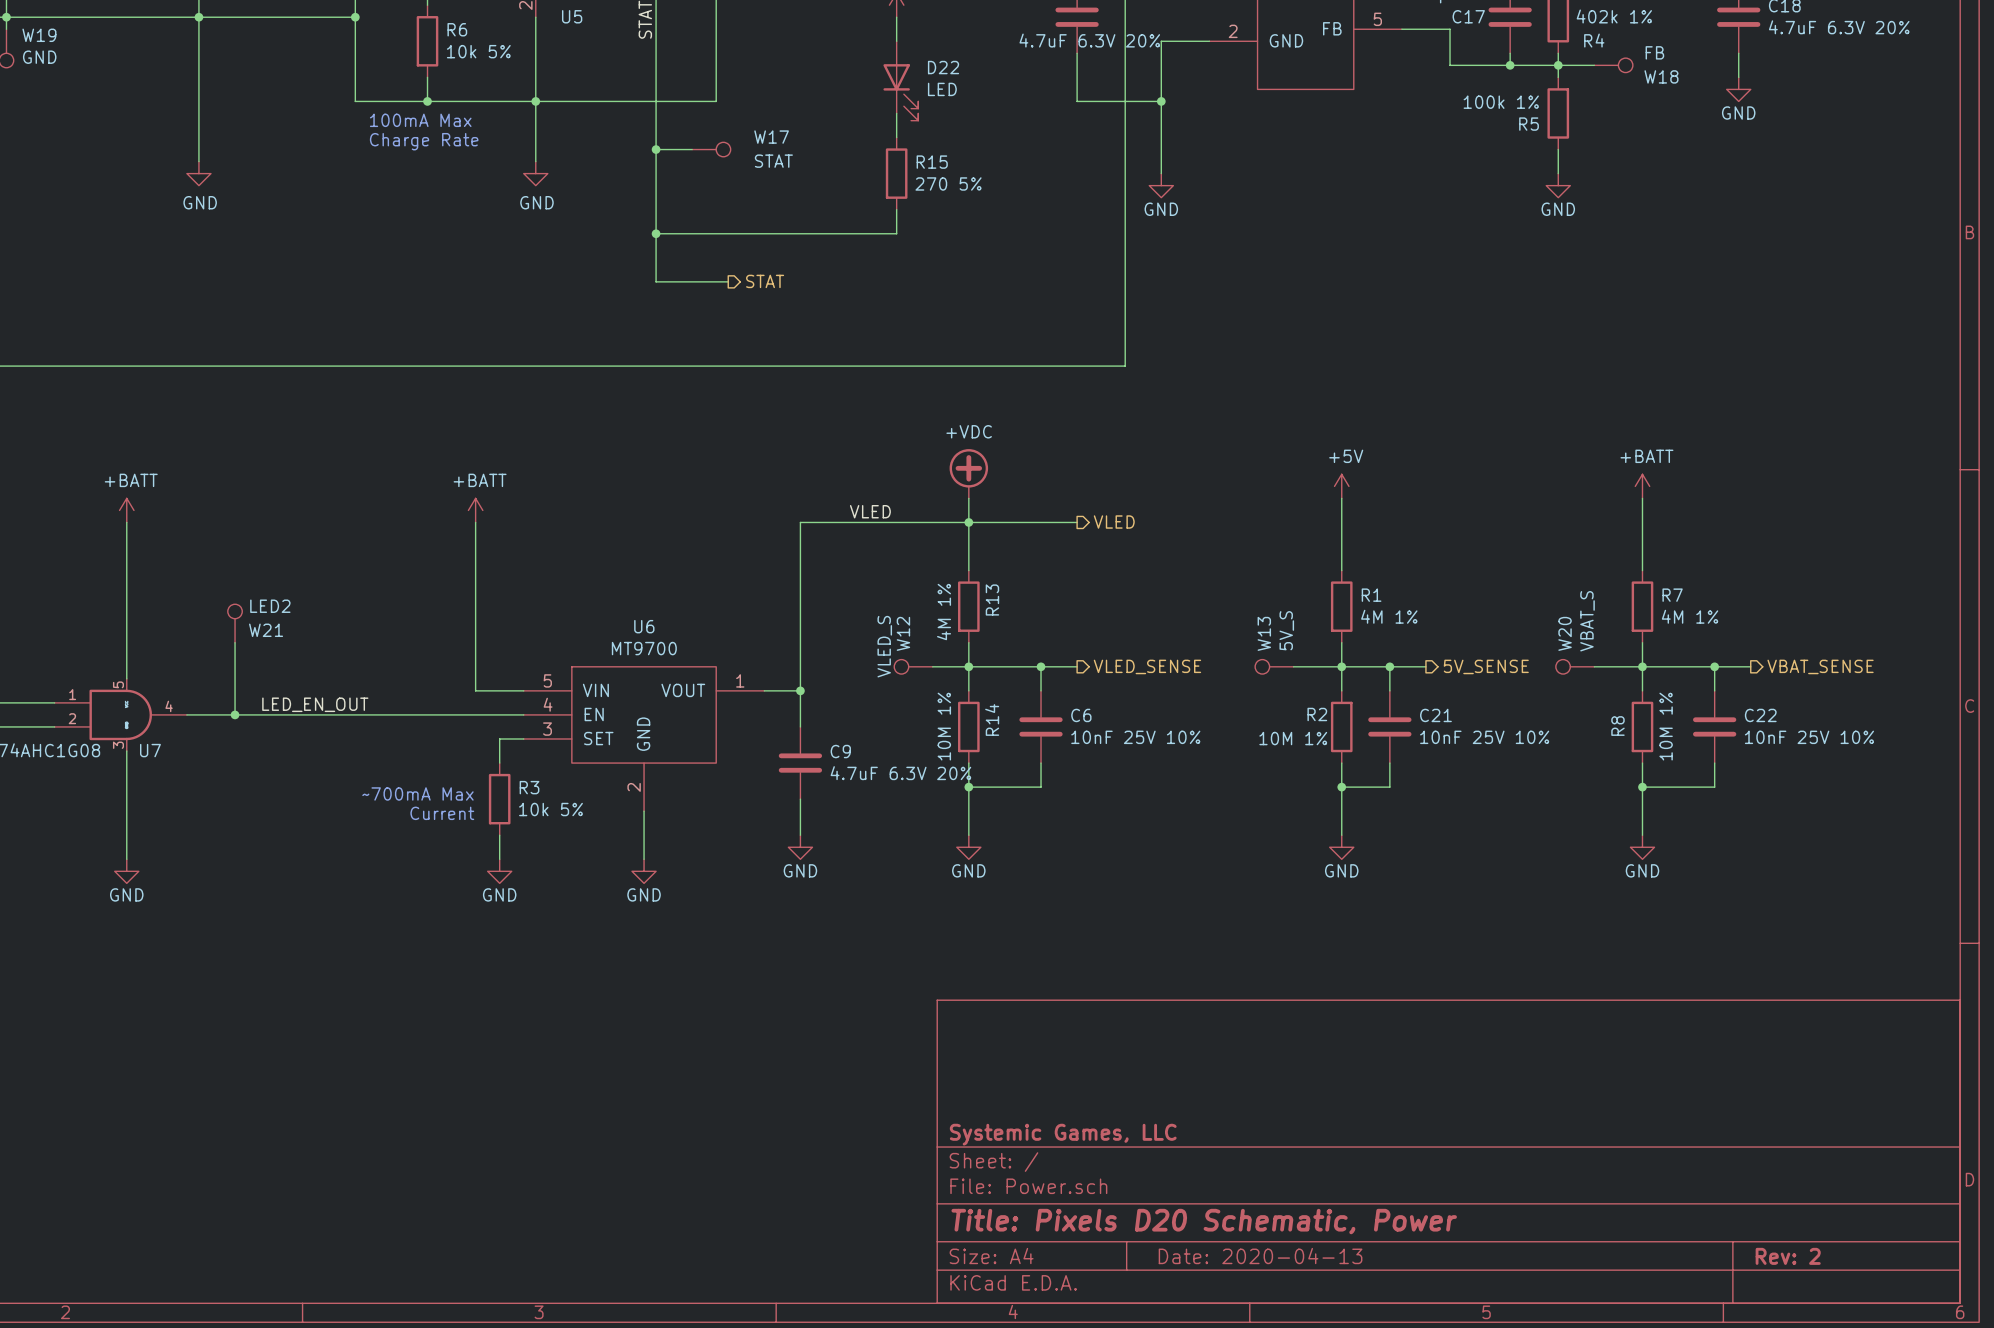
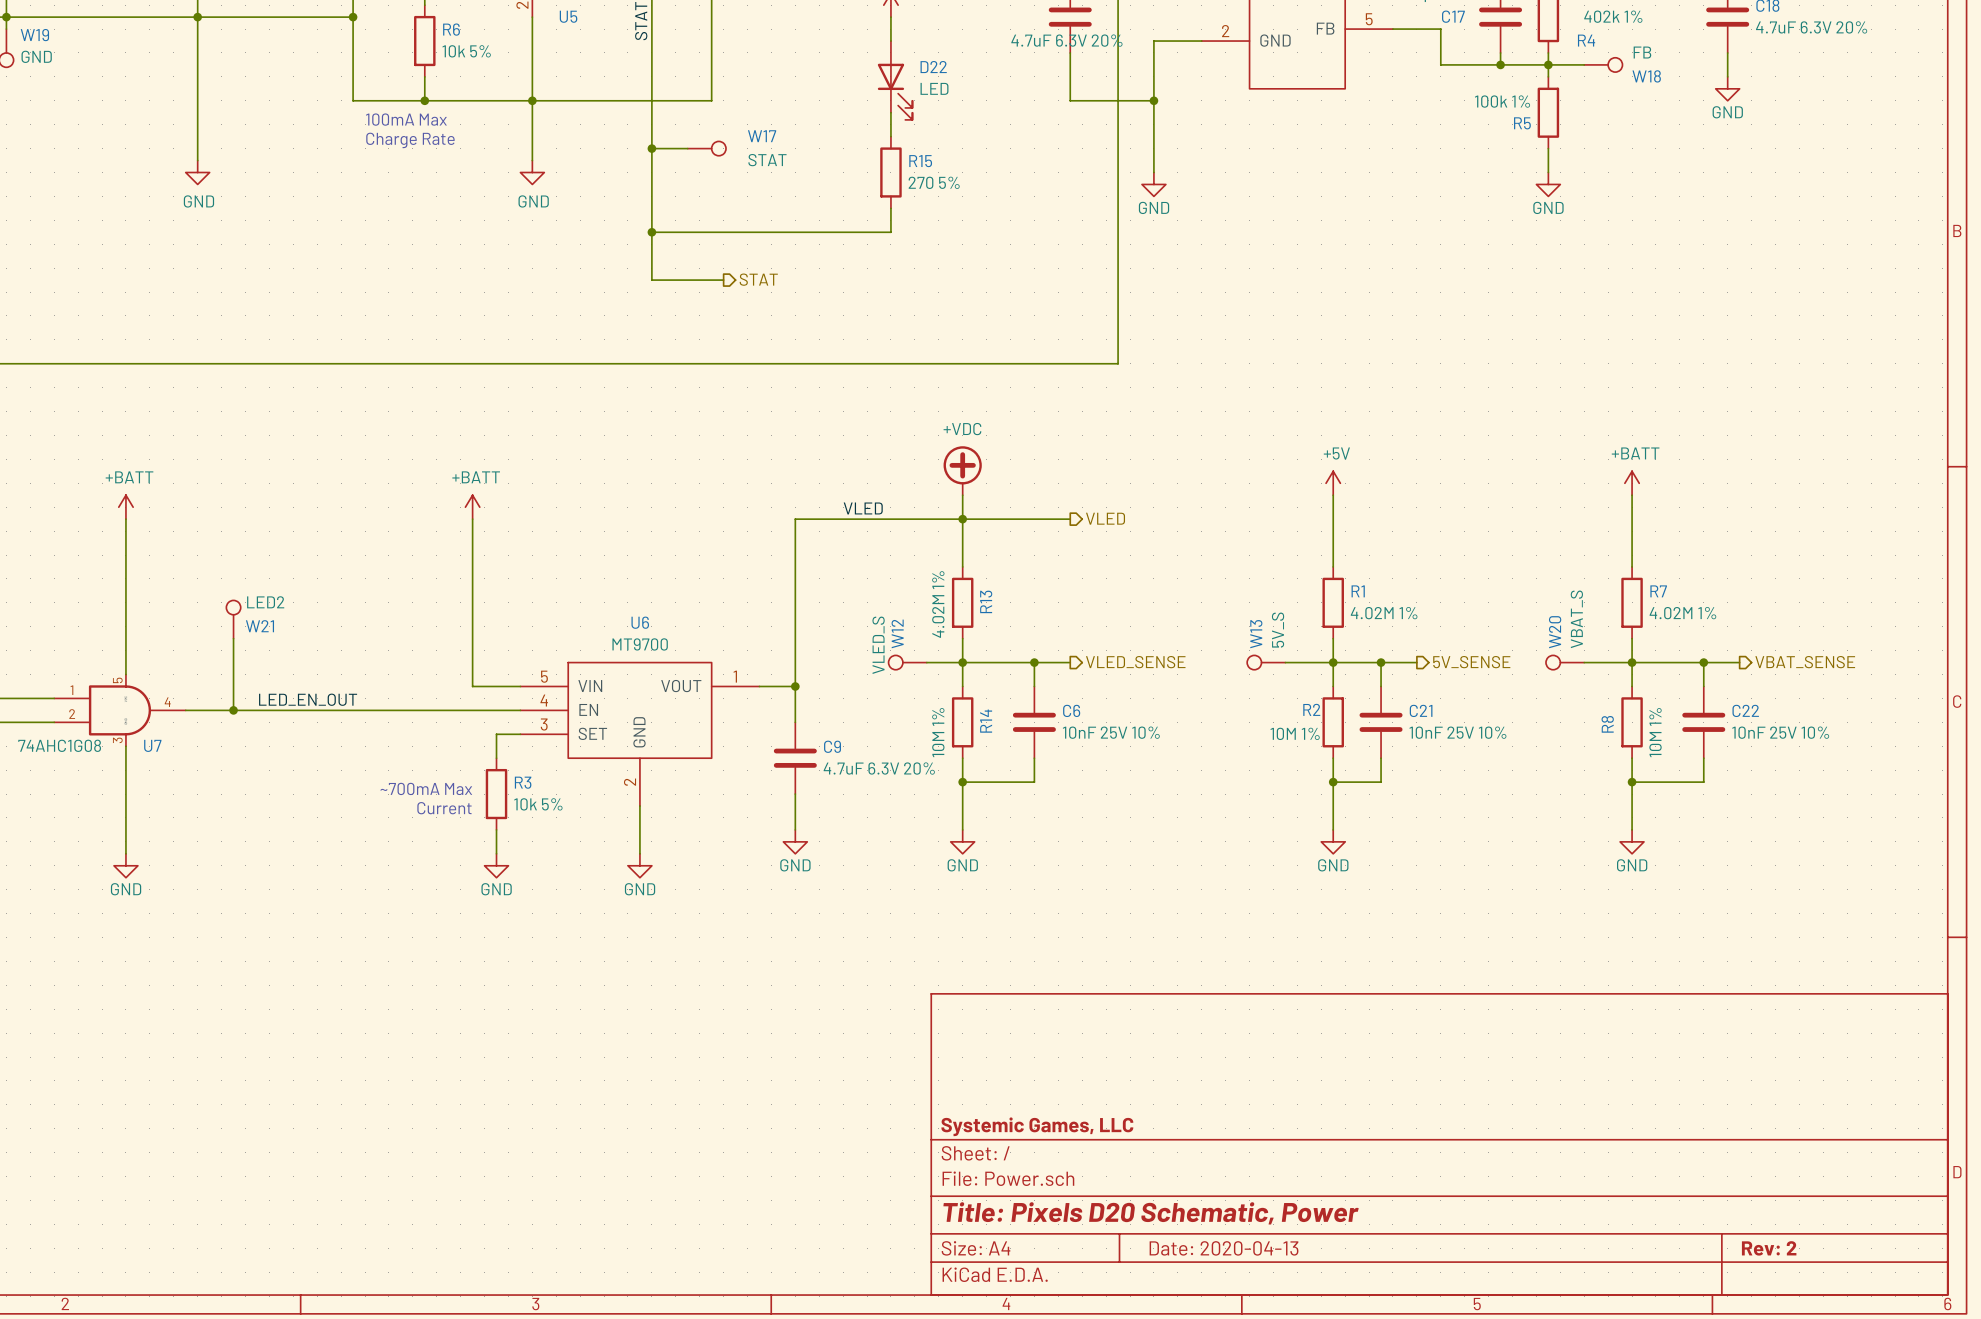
R13 value: 4M 1% (944, 612) -> 4.02M 1% (938, 604)
R1 value: 4M 1% (1389, 616) -> 4.02M 1% (1384, 613)
R7 value: 4M 1% (1690, 616) -> 4.02M 1% (1682, 613)

